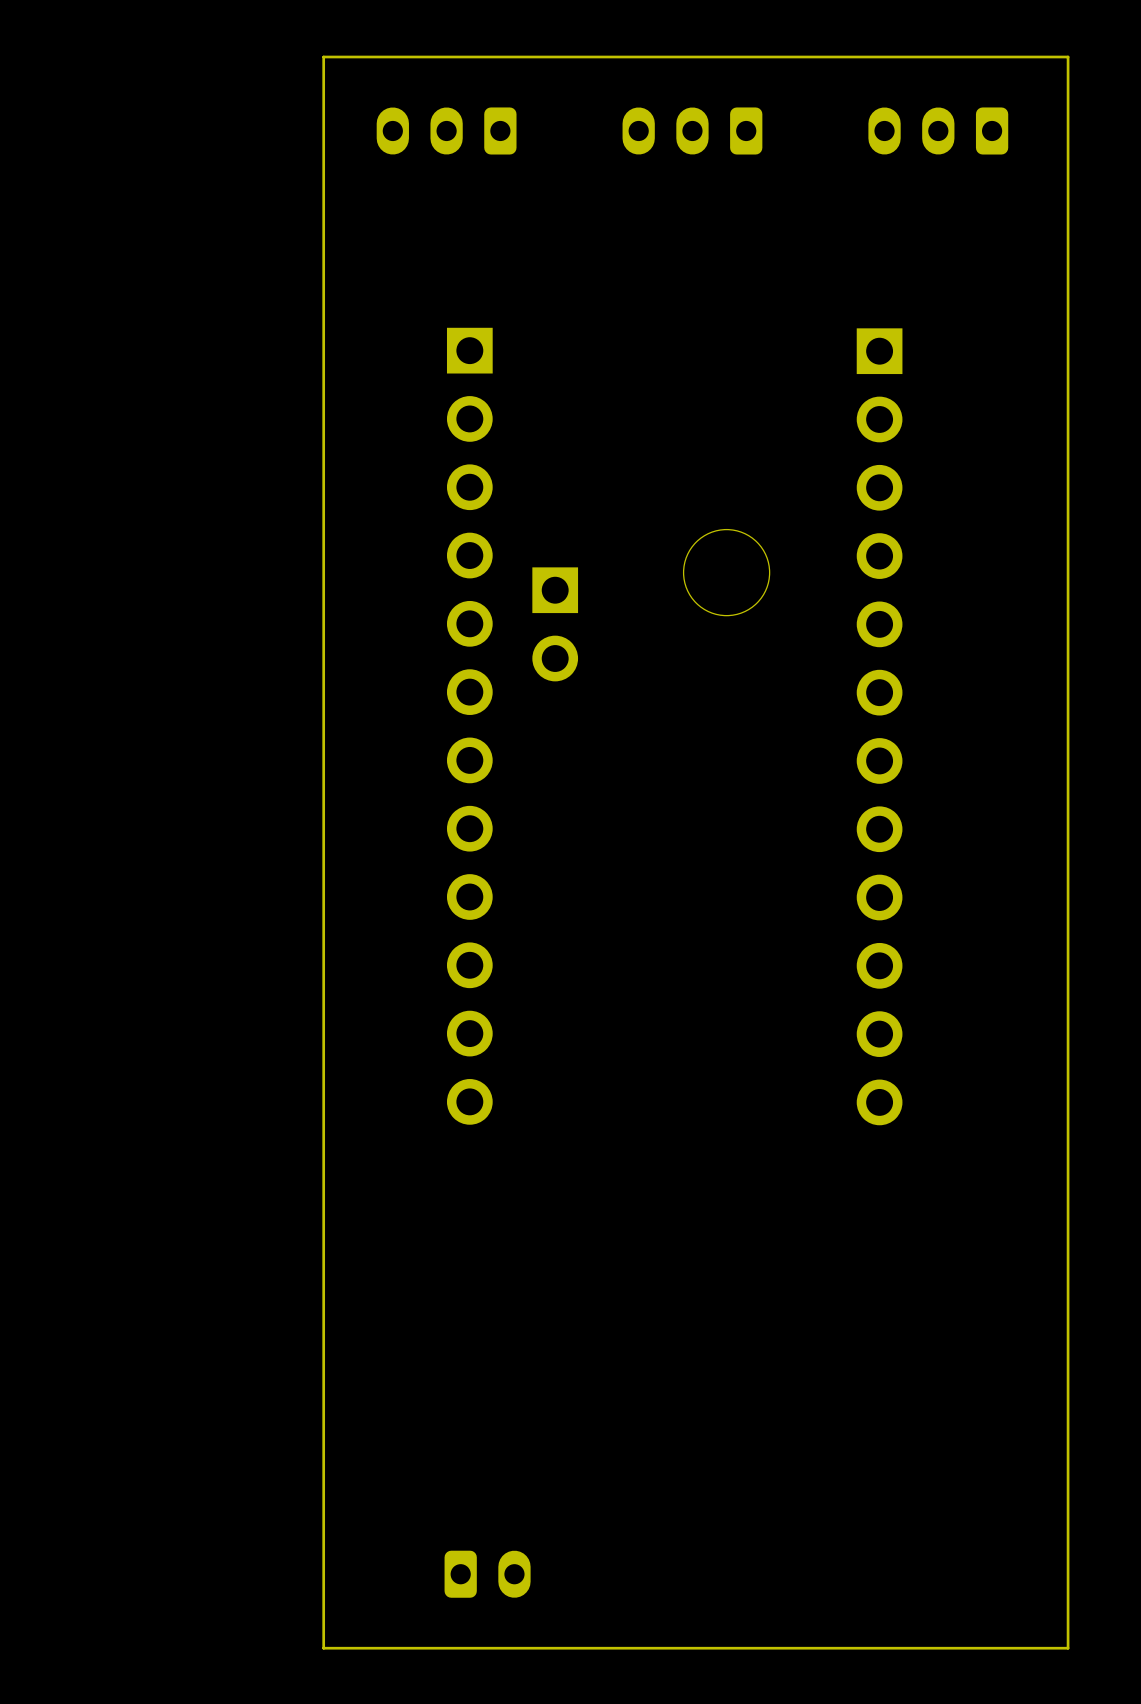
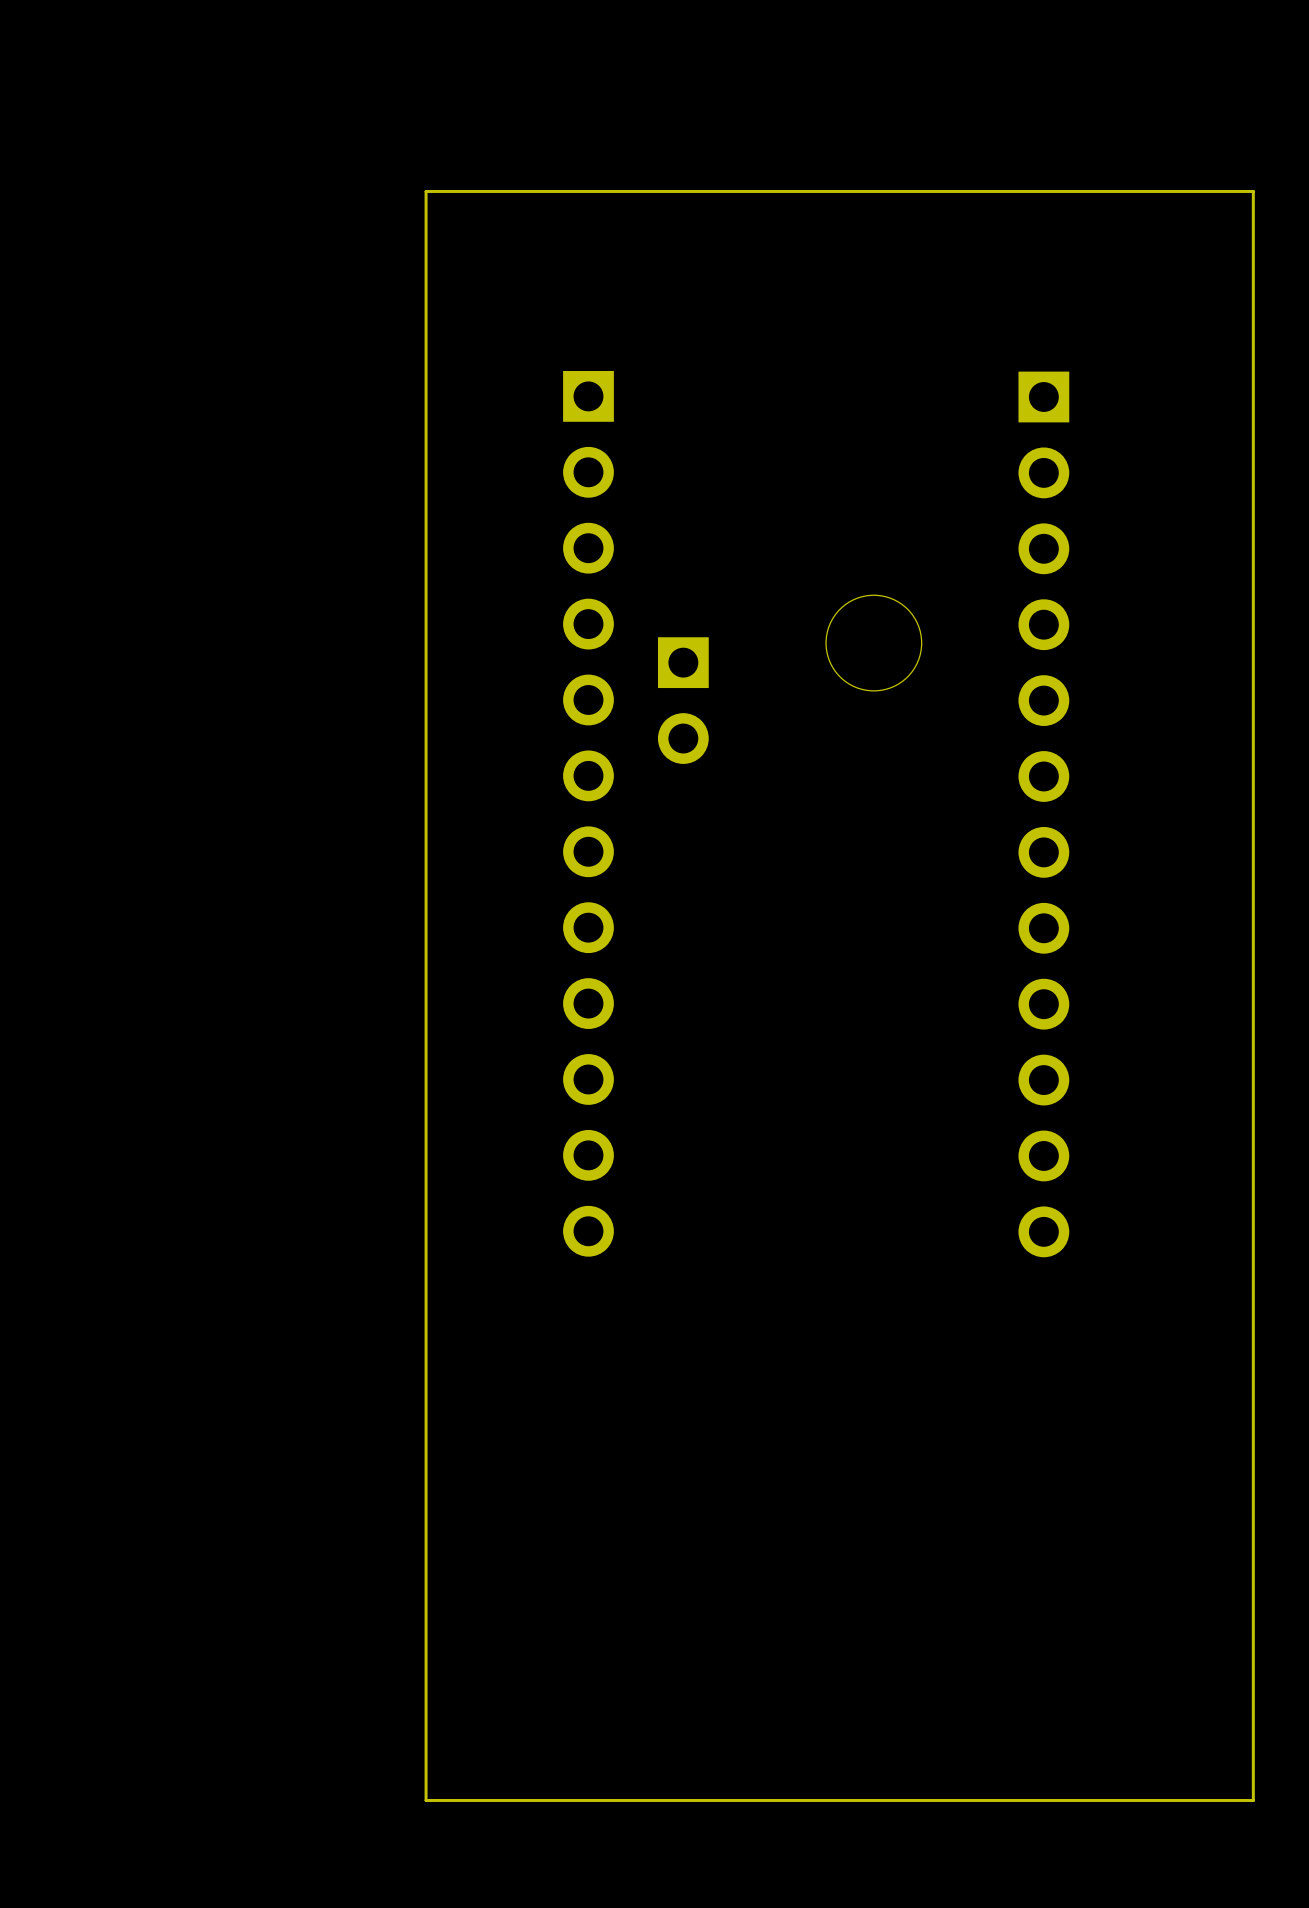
part: (446, 130) -> none
part: (692, 130) -> none
part: (938, 130) -> none
board edge: (1068, 166) (1068, 56) (323, 56) (323, 166) -> (1253, 191) (426, 191)
part: (487, 1574) -> none
board edge: (1068, 1614) (1068, 1648) (323, 1648) (323, 1614) -> (1253, 1800) (426, 1800)

